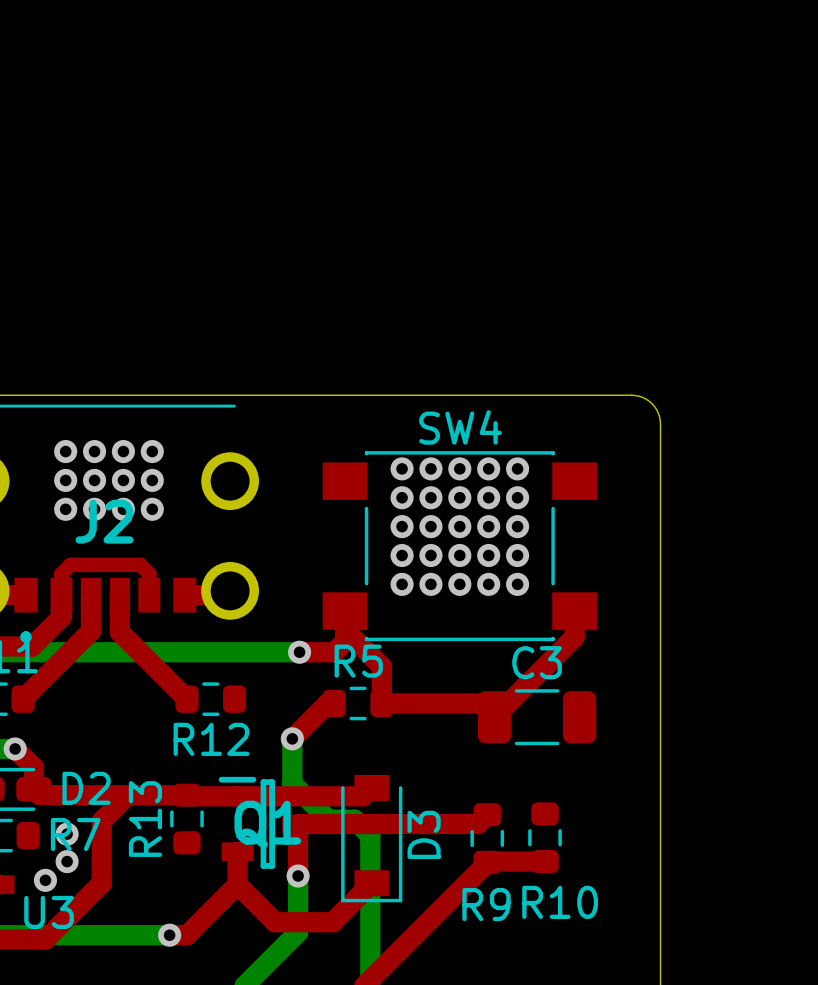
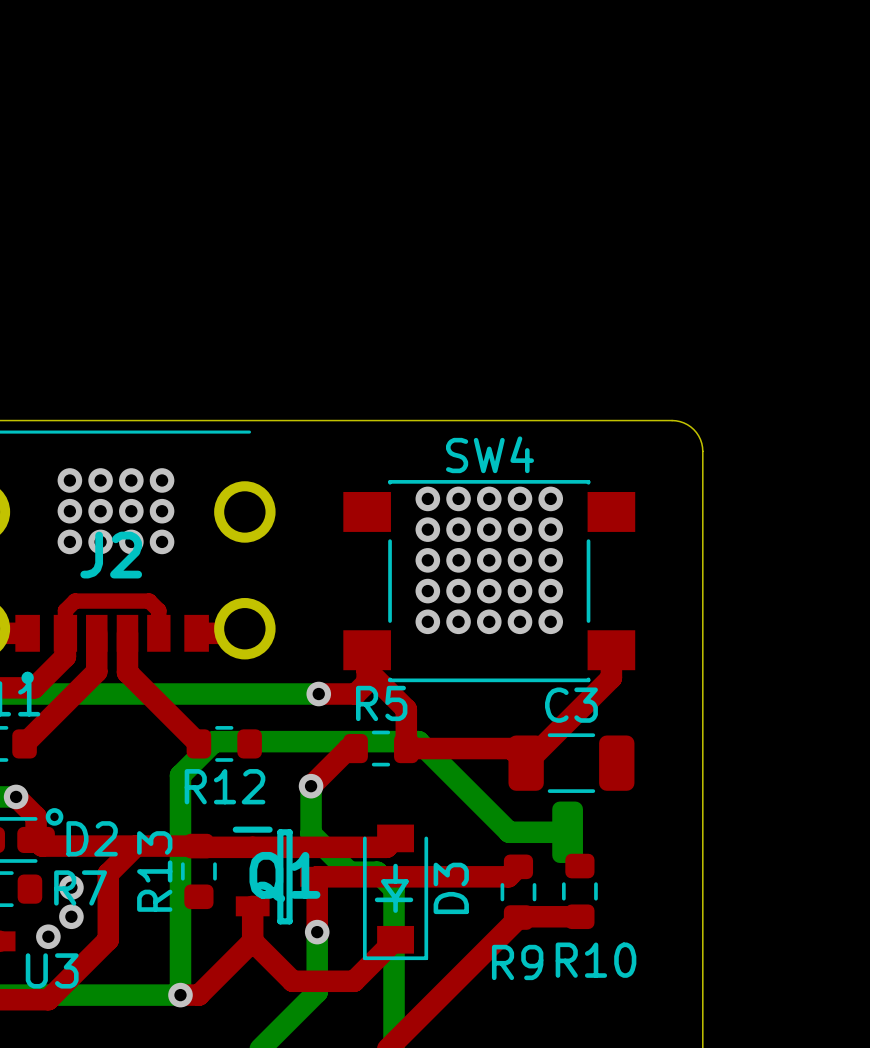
drawing: none -> [45, 808, 64, 826]
bottom track: none -> (567, 832) (509, 832) (418, 741) (214, 741) (180, 775) (180, 995)
part: none -> (567, 832)
line: none -> (395, 866) (395, 881)
line: none -> (383, 881) (395, 898)
line: none -> (384, 881) (406, 881) (395, 898)
line: none -> (395, 898) (395, 910)
line: none -> (377, 899) (410, 899)

